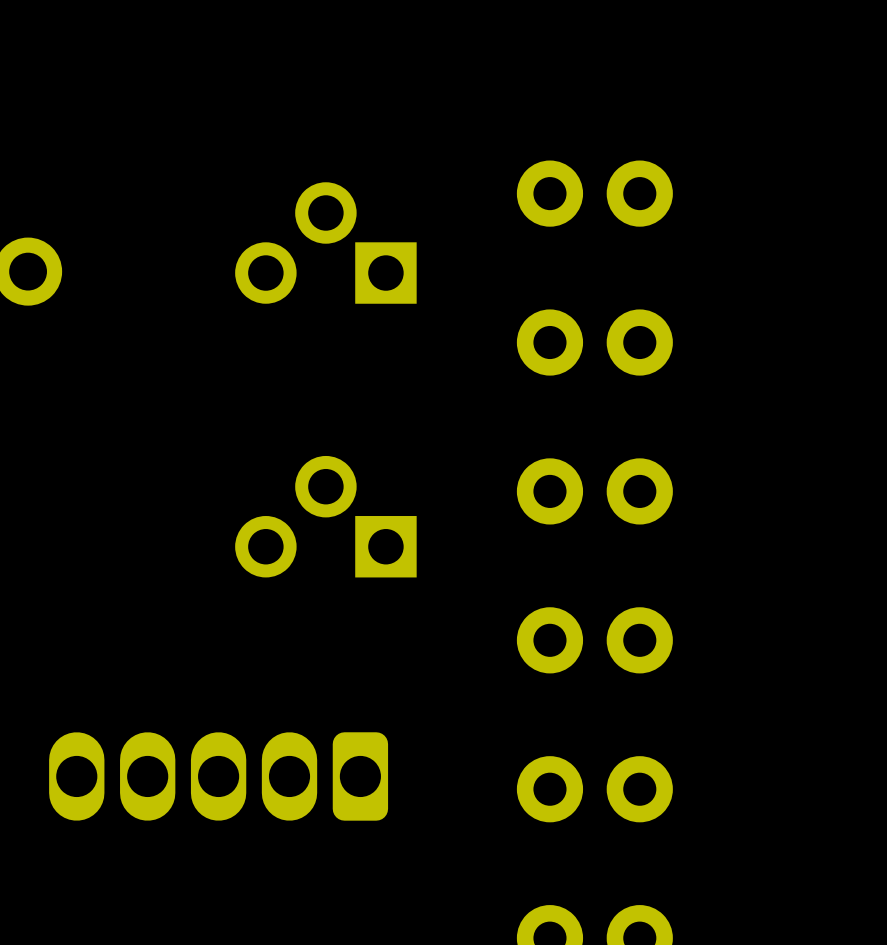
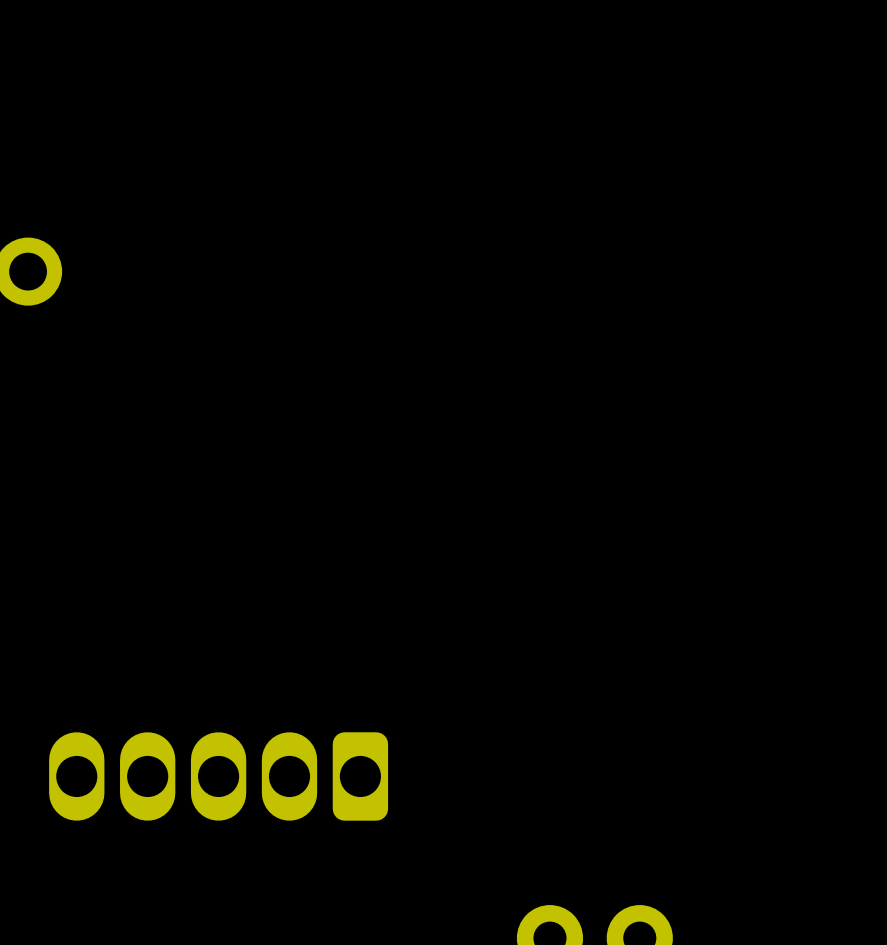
part: (594, 193) -> none
part: (325, 243) -> none
part: (594, 342) -> none
part: (594, 491) -> none
part: (325, 516) -> none
part: (594, 640) -> none
part: (594, 789) -> none

